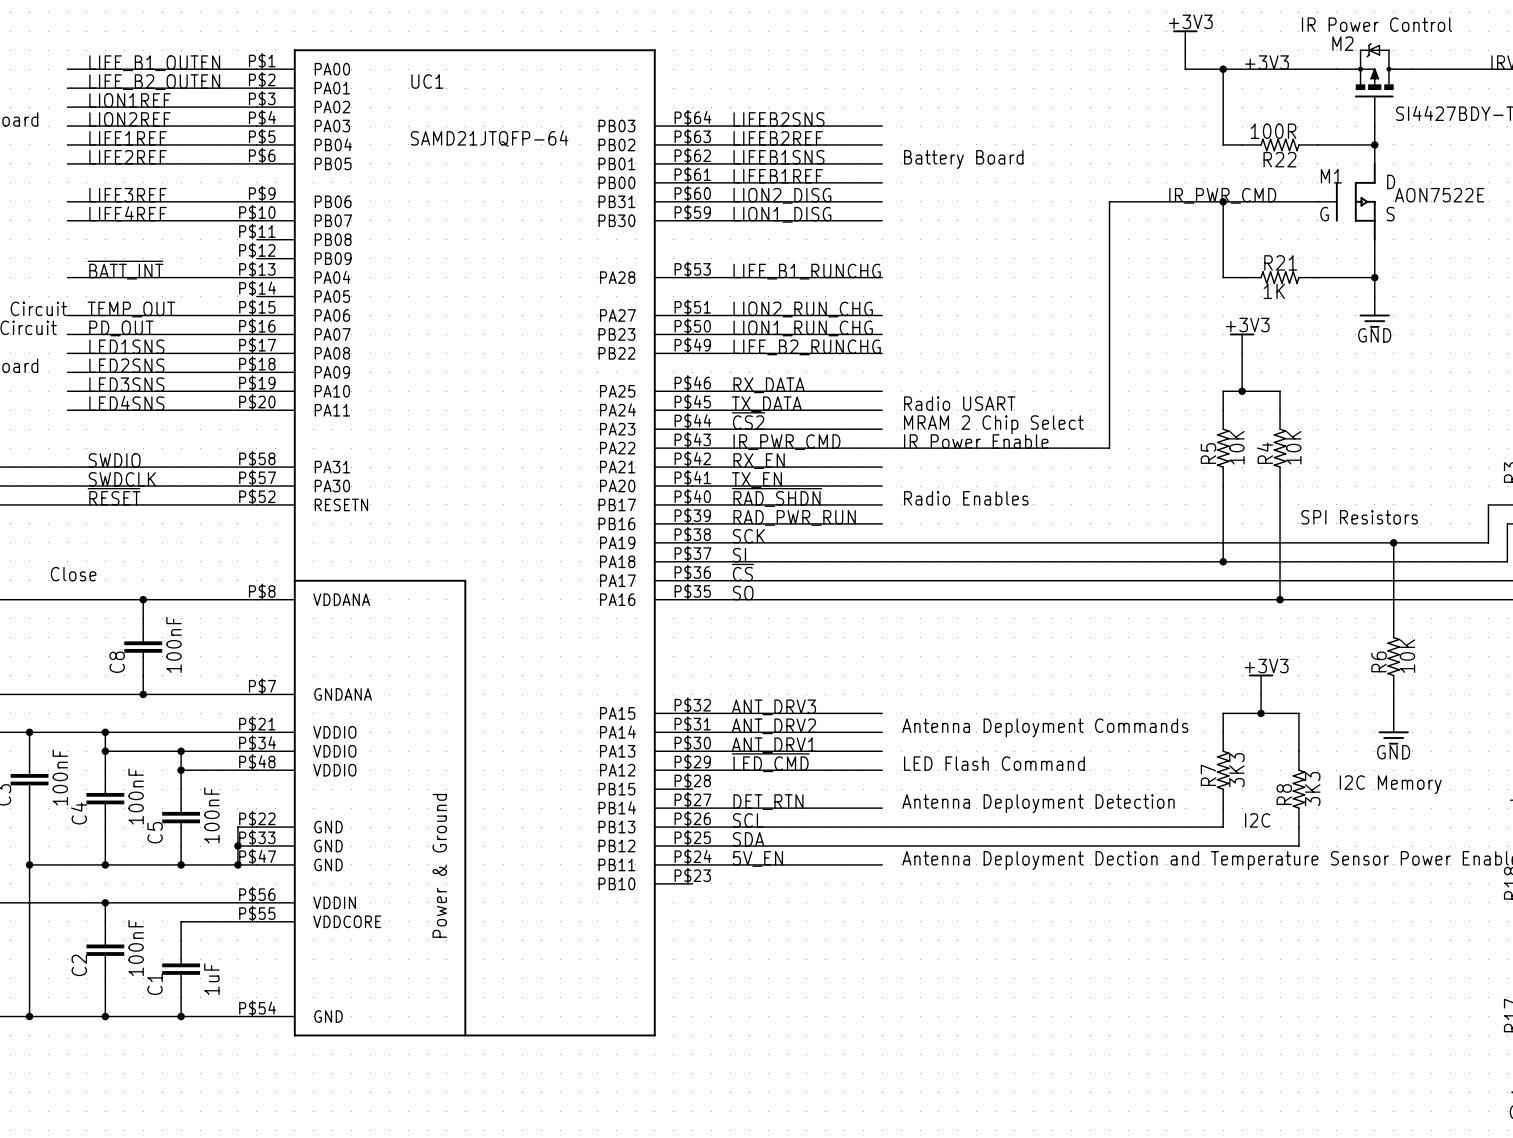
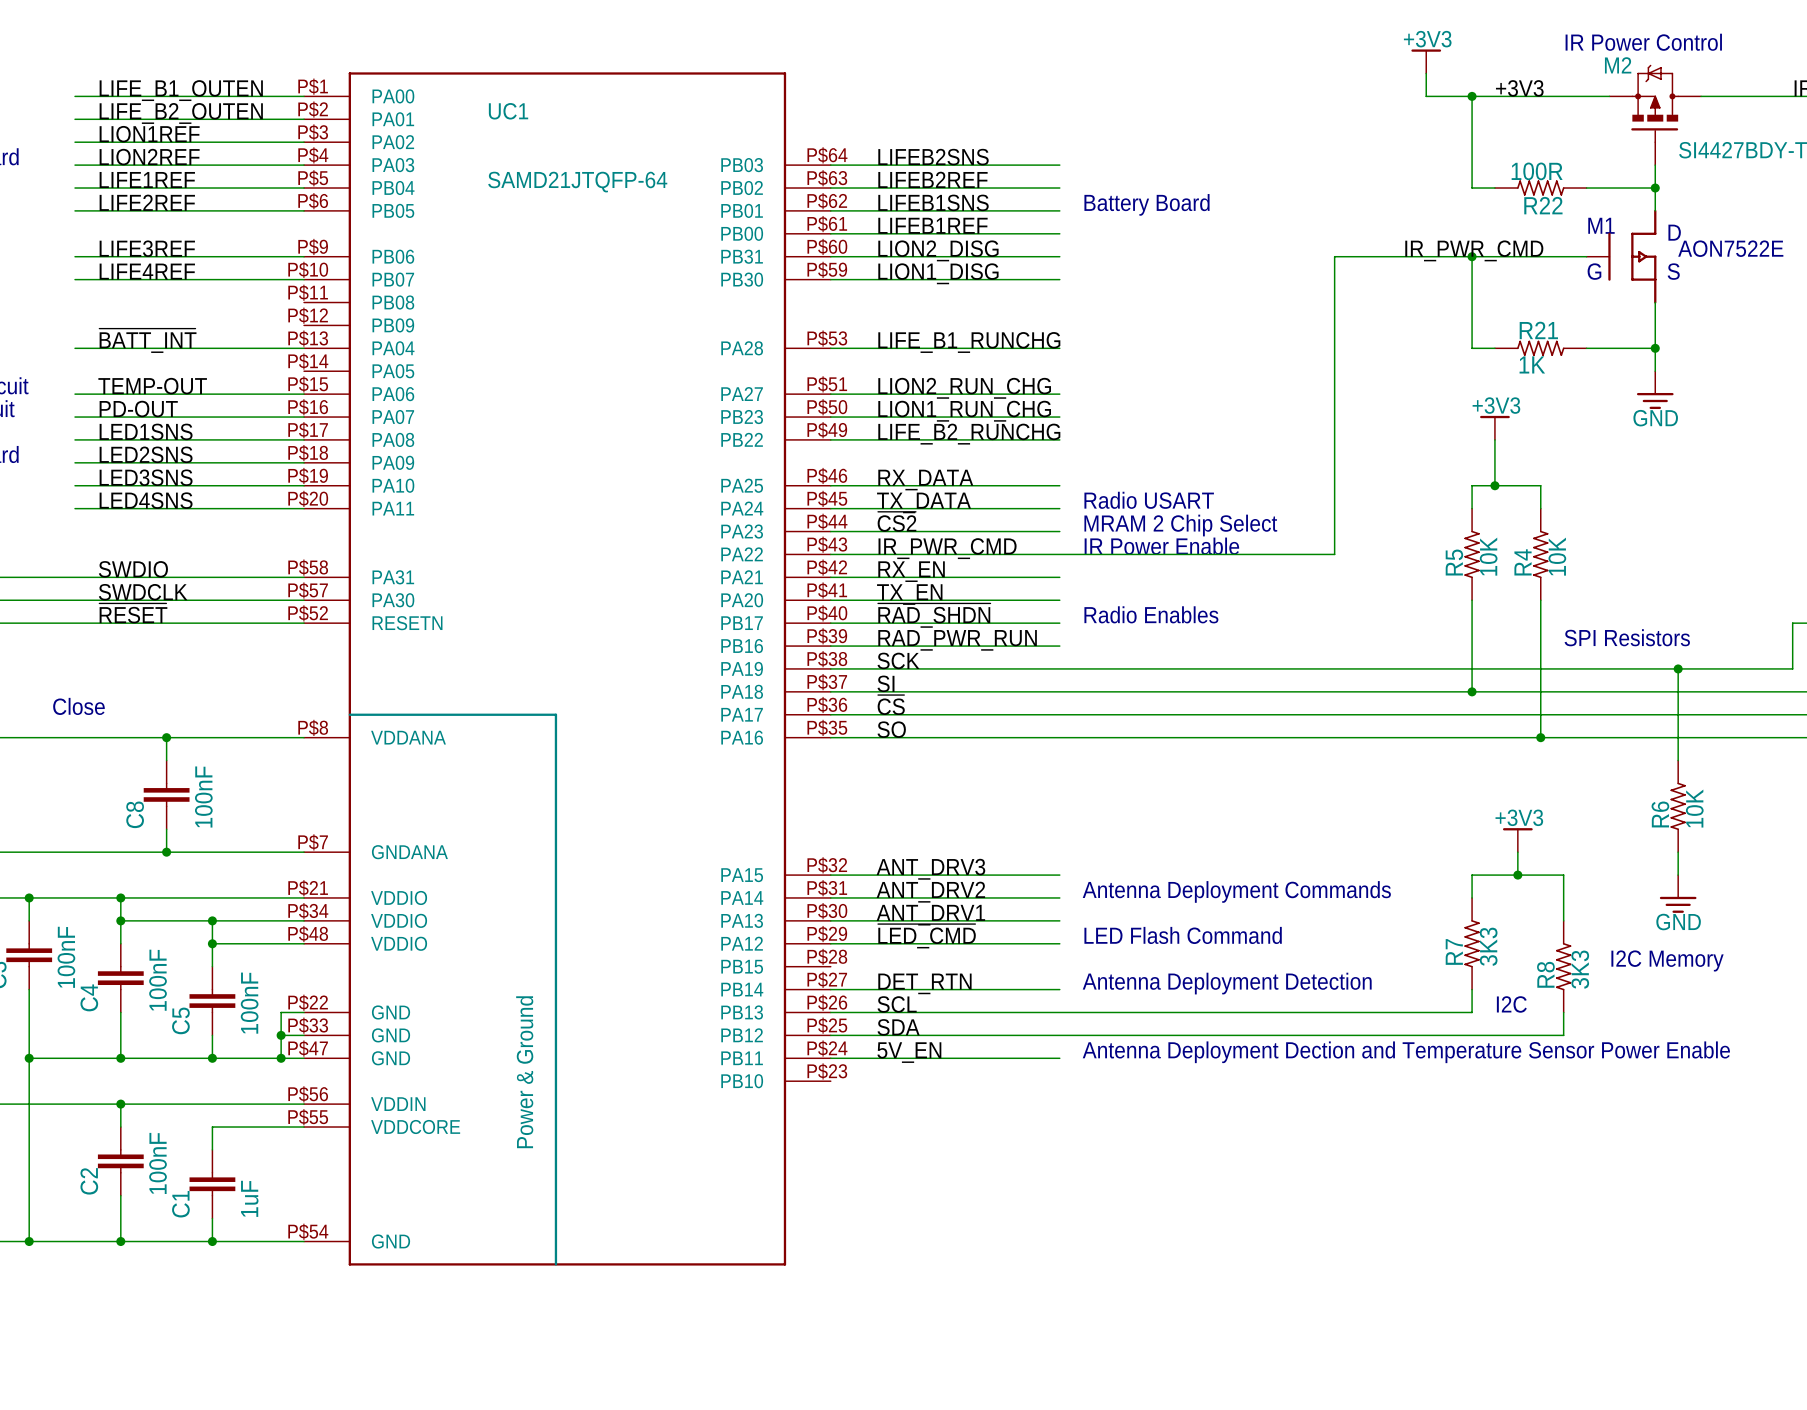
label: TEMP_OUT (131, 309) -> TEMP-OUT (152, 386)
label: PD_OUT (121, 328) -> PD-OUT (138, 409)

